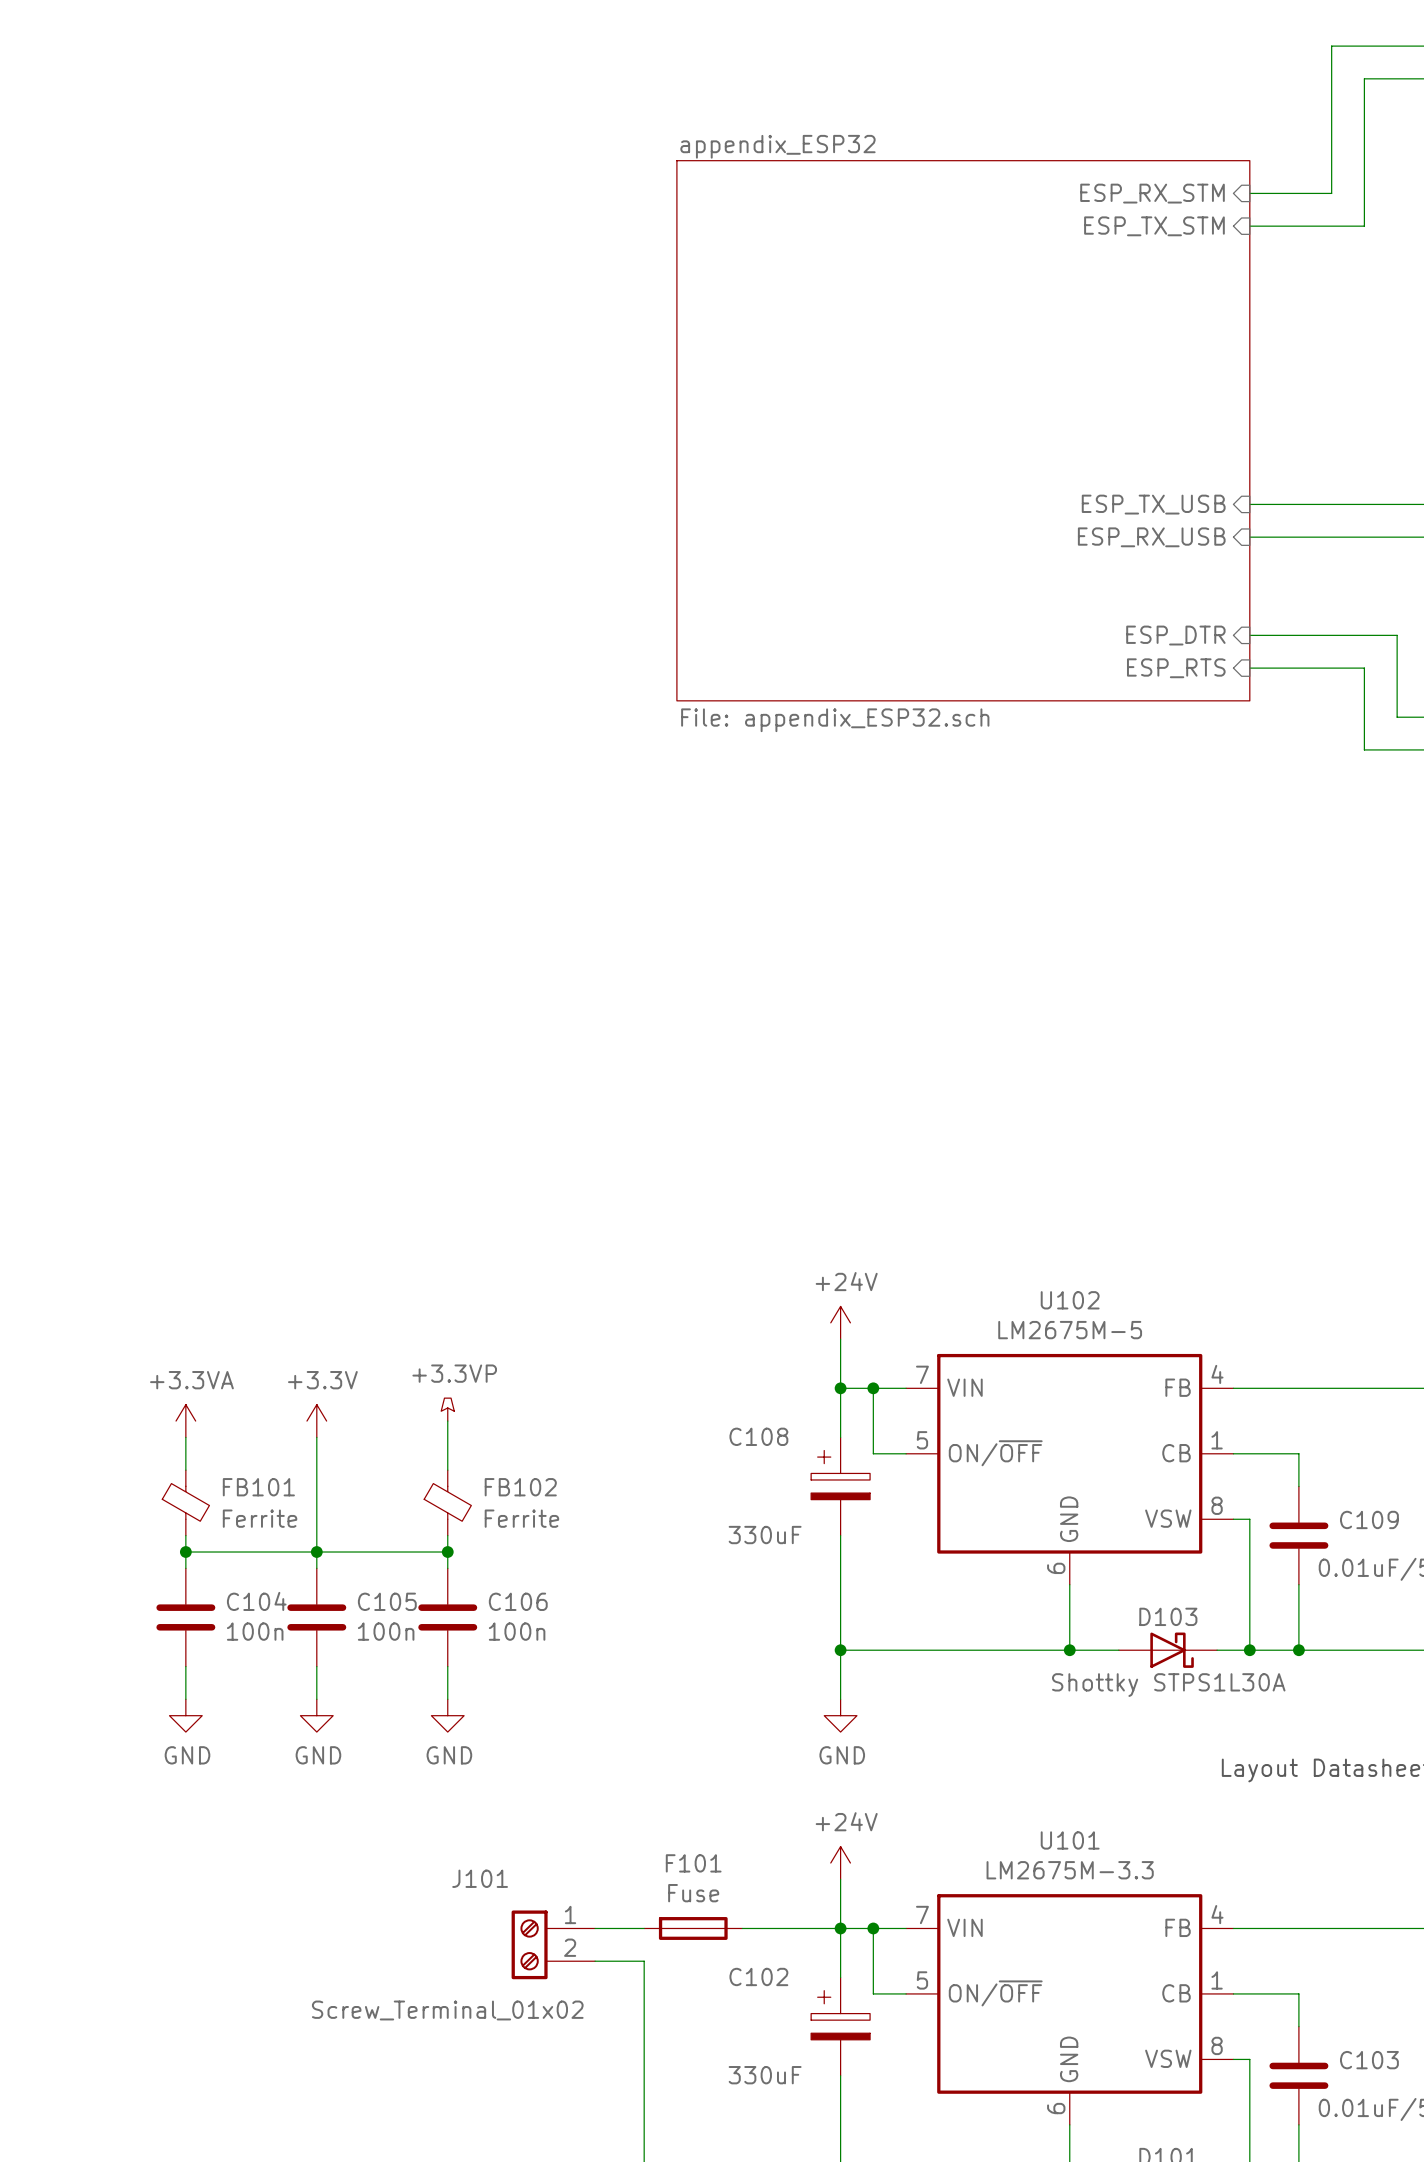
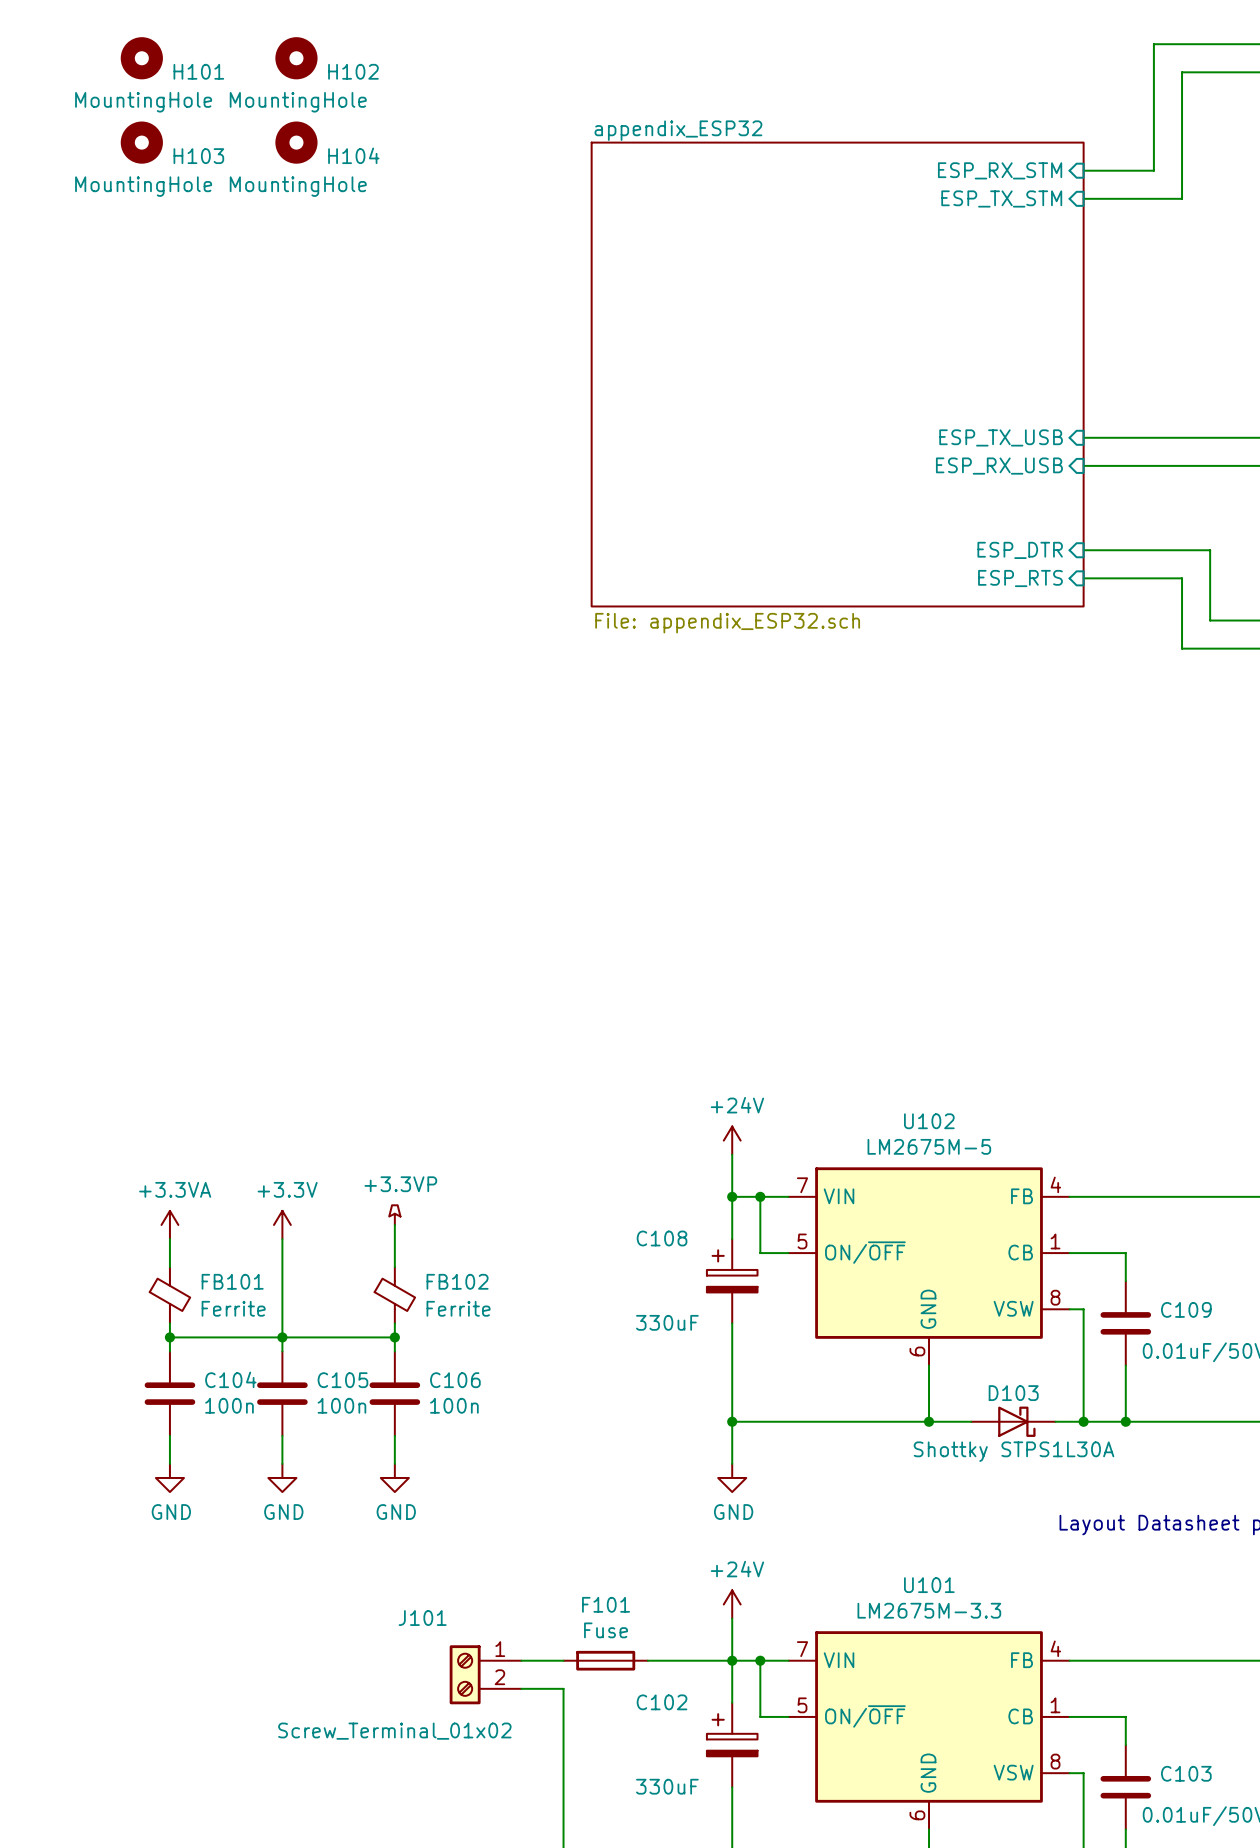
H101: none -> MountingHole (141, 58)
H102: none -> MountingHole (296, 58)
H103: none -> MountingHole (141, 142)
H104: none -> MountingHole (296, 142)

